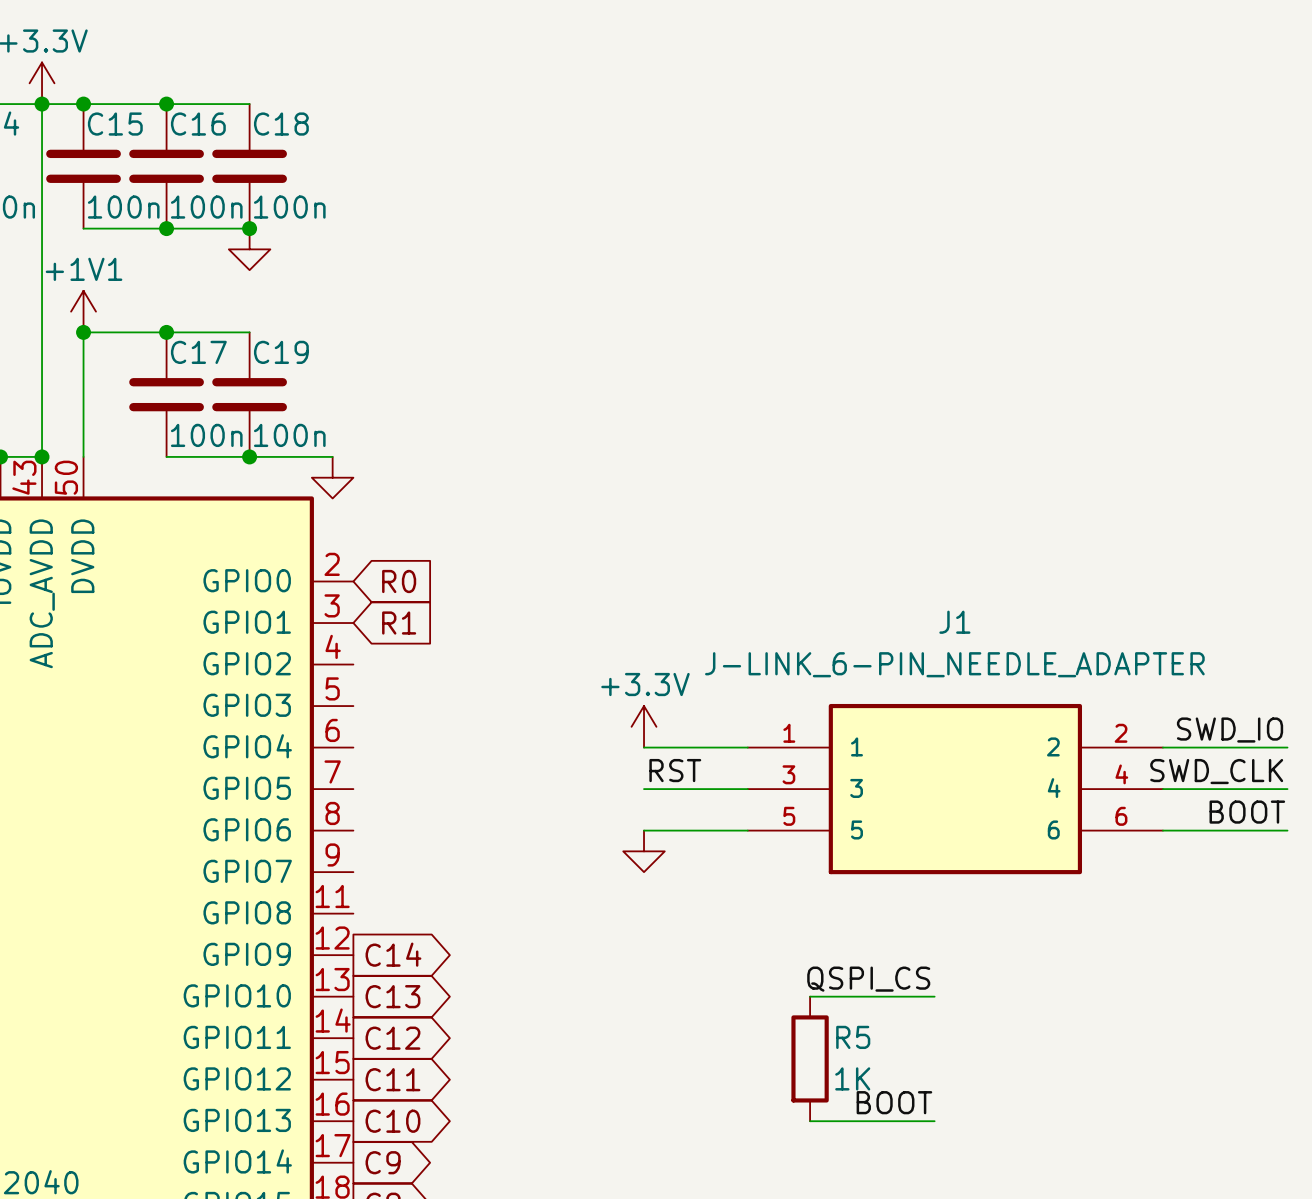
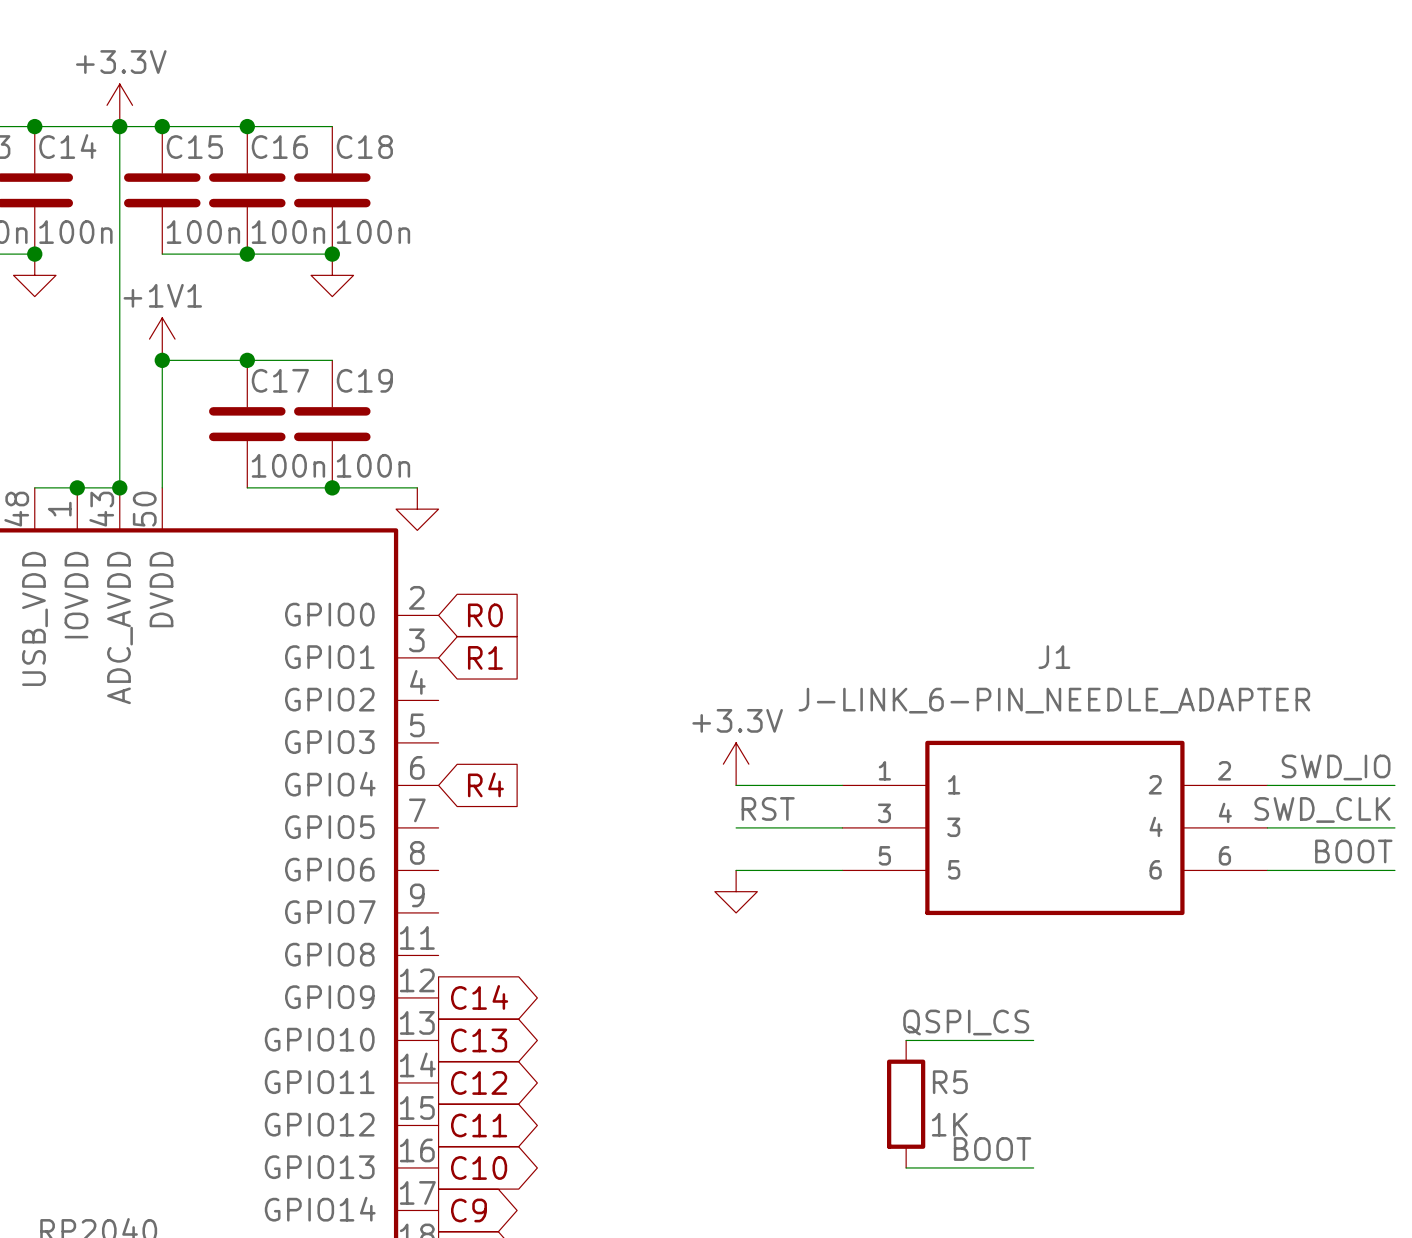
global label: none -> R4 (485, 784)

